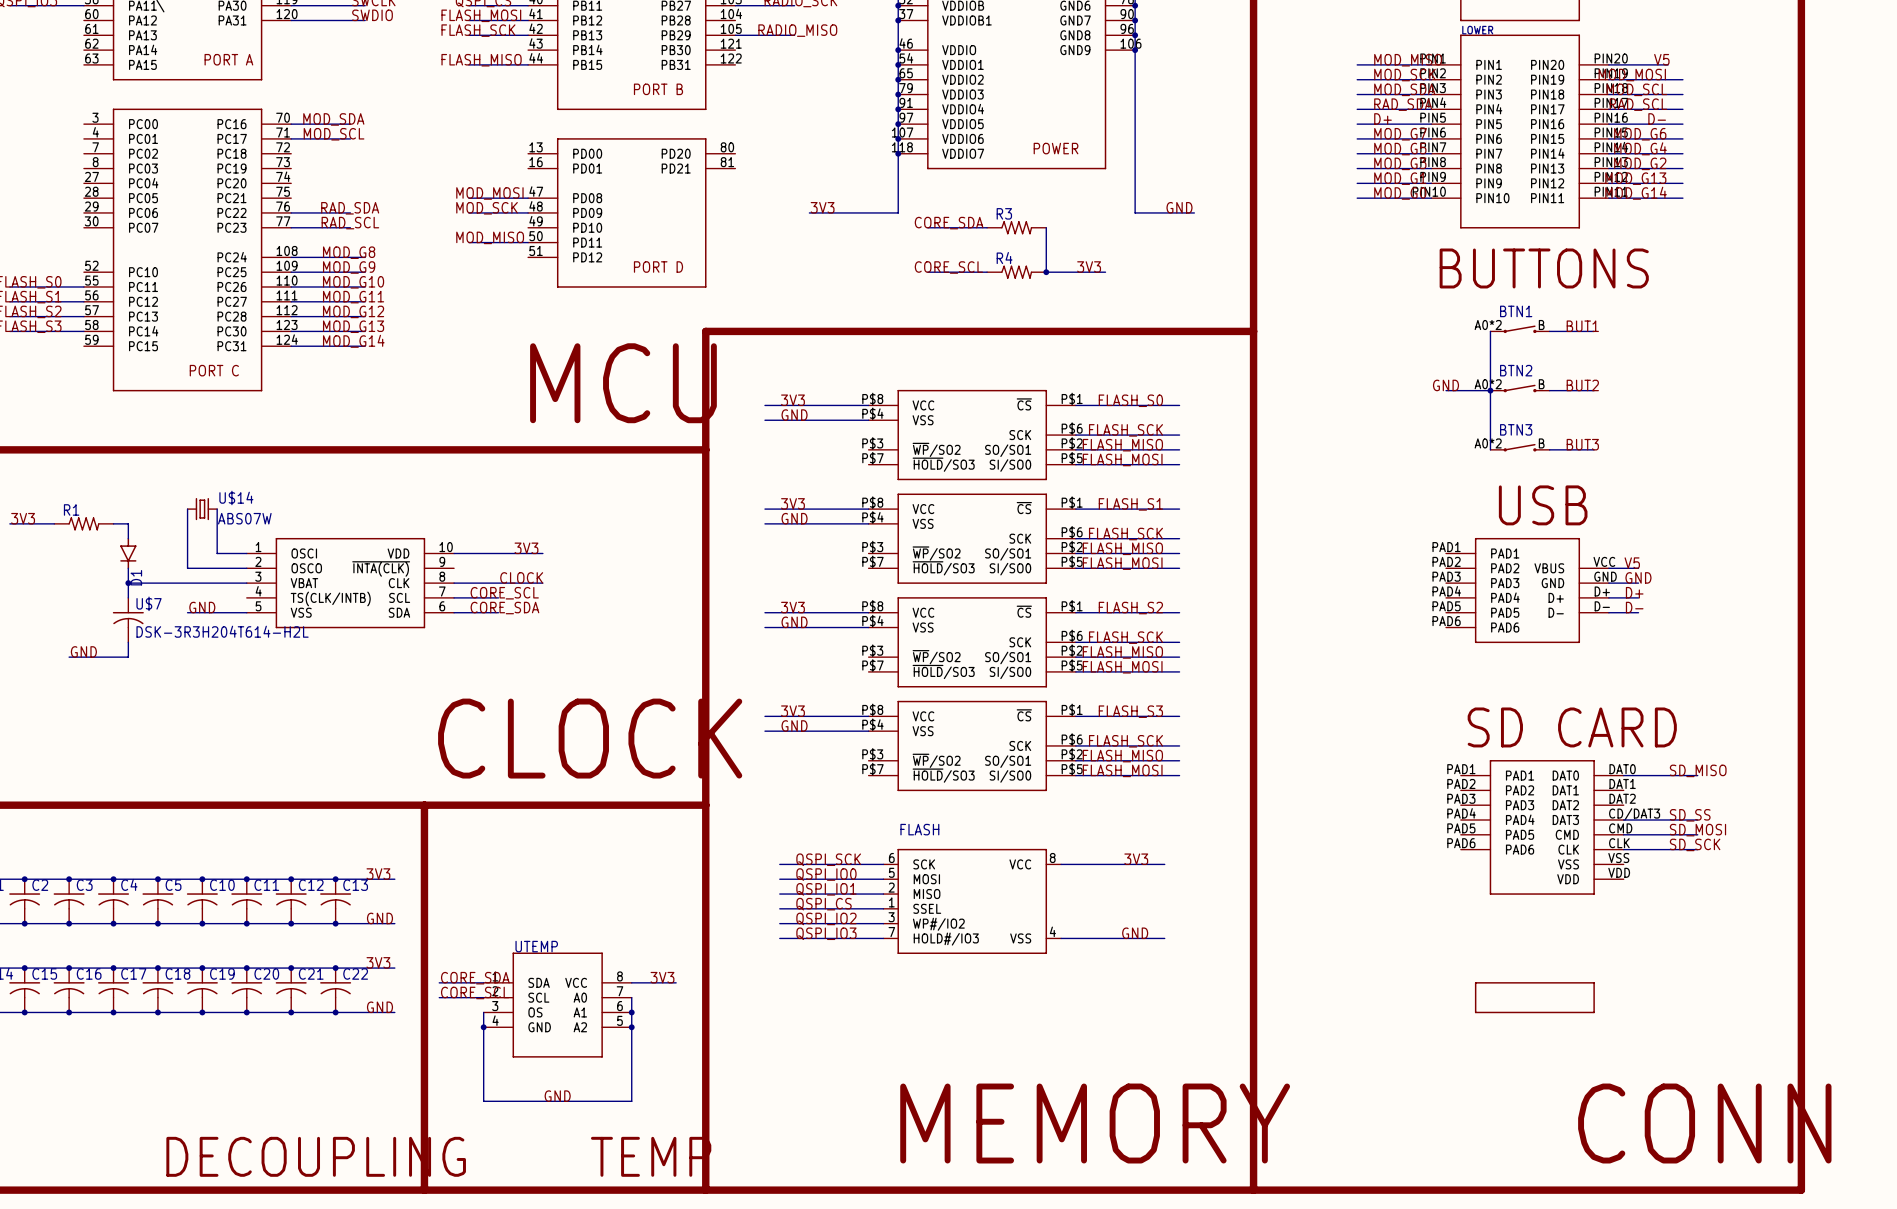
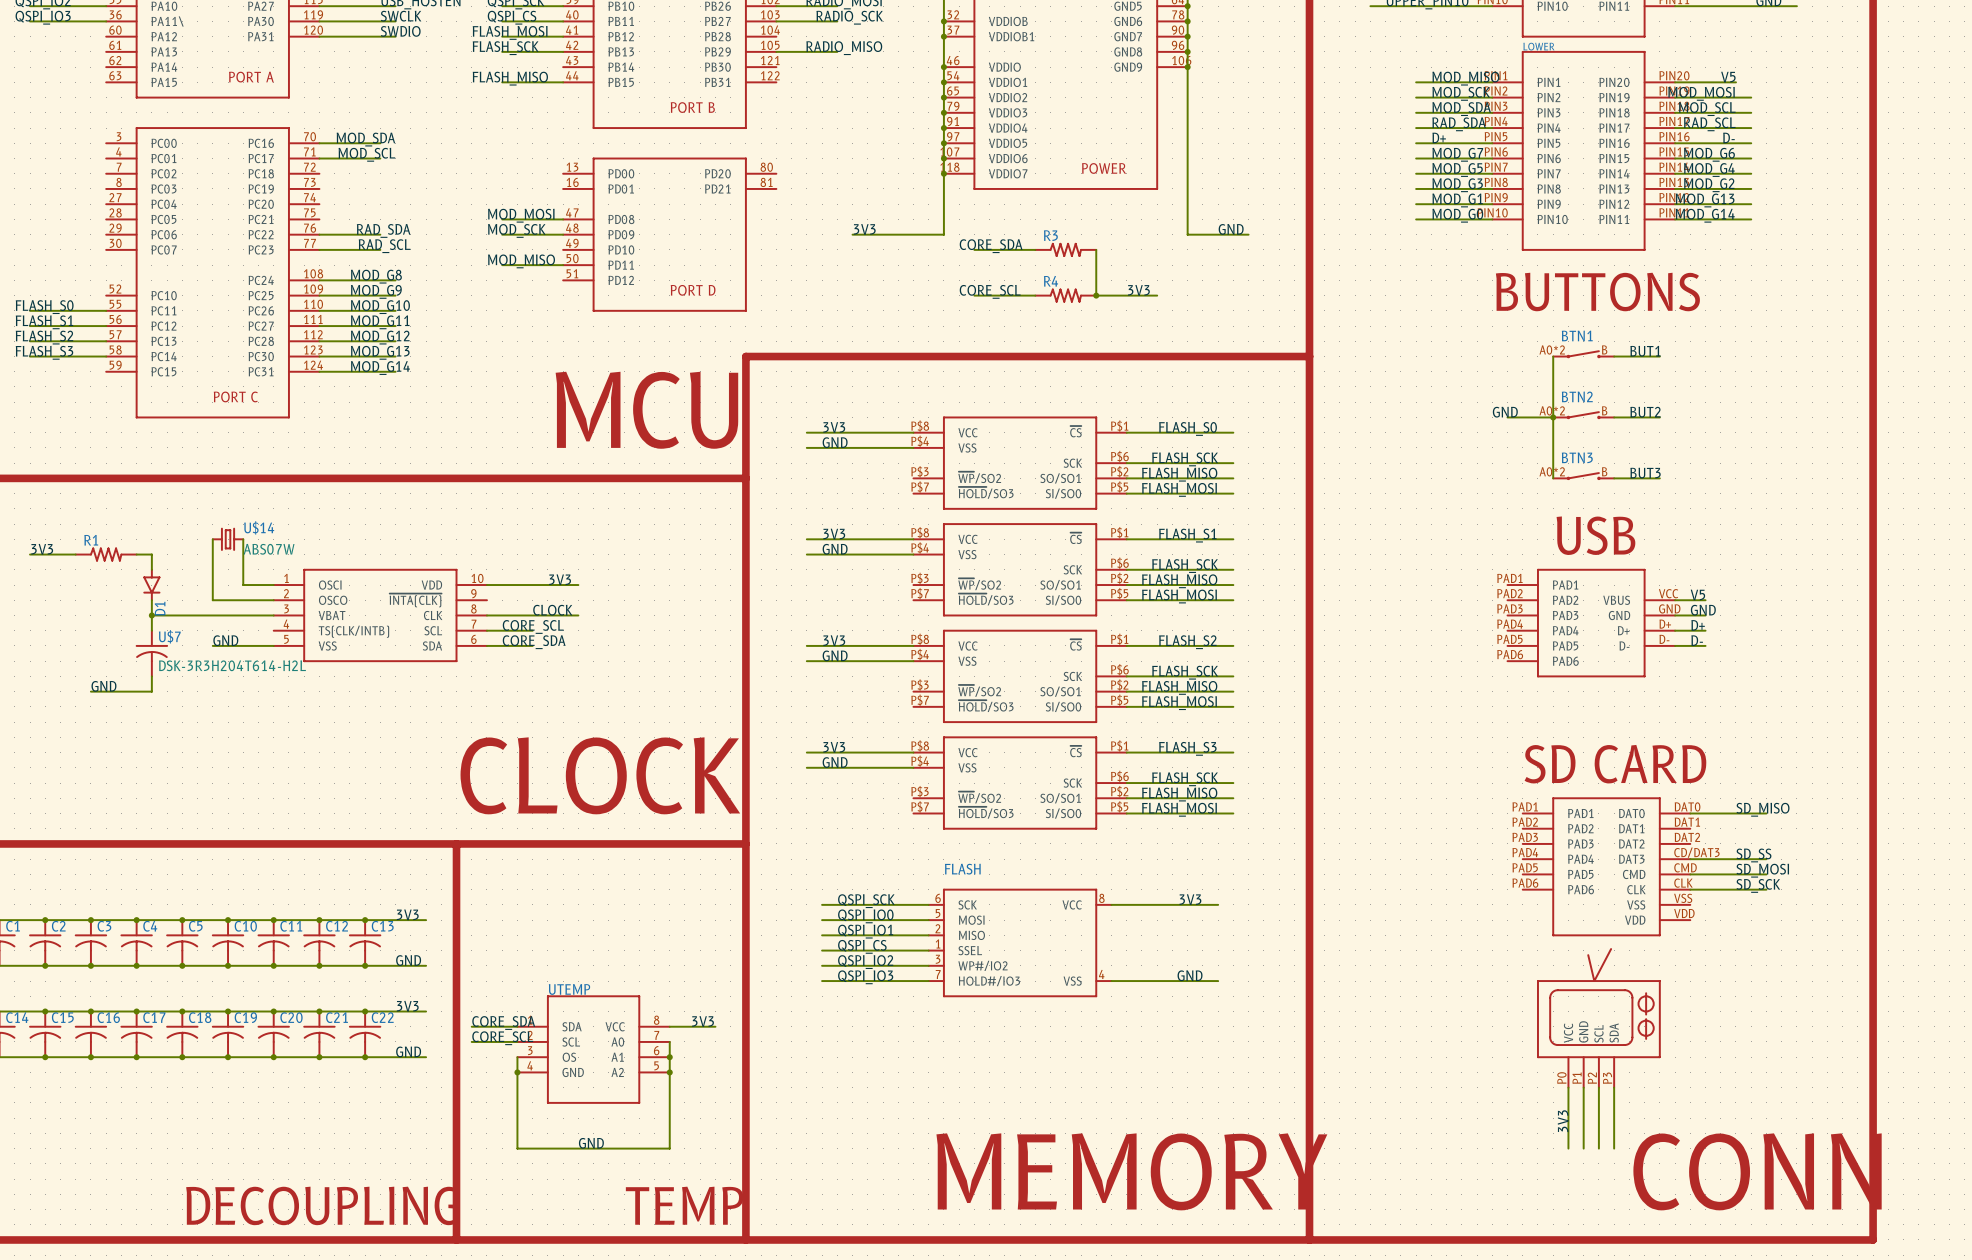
part: none -> (1598, 1017)
part: (1534, 997) -> none
wire: none -> (1568, 1087) (1568, 1148)
wire: none -> (1583, 1087) (1583, 1148)
wire: none -> (1598, 1087) (1598, 1148)
wire: none -> (1614, 1087) (1614, 1148)
label: none -> 3V3 (1563, 1121)

